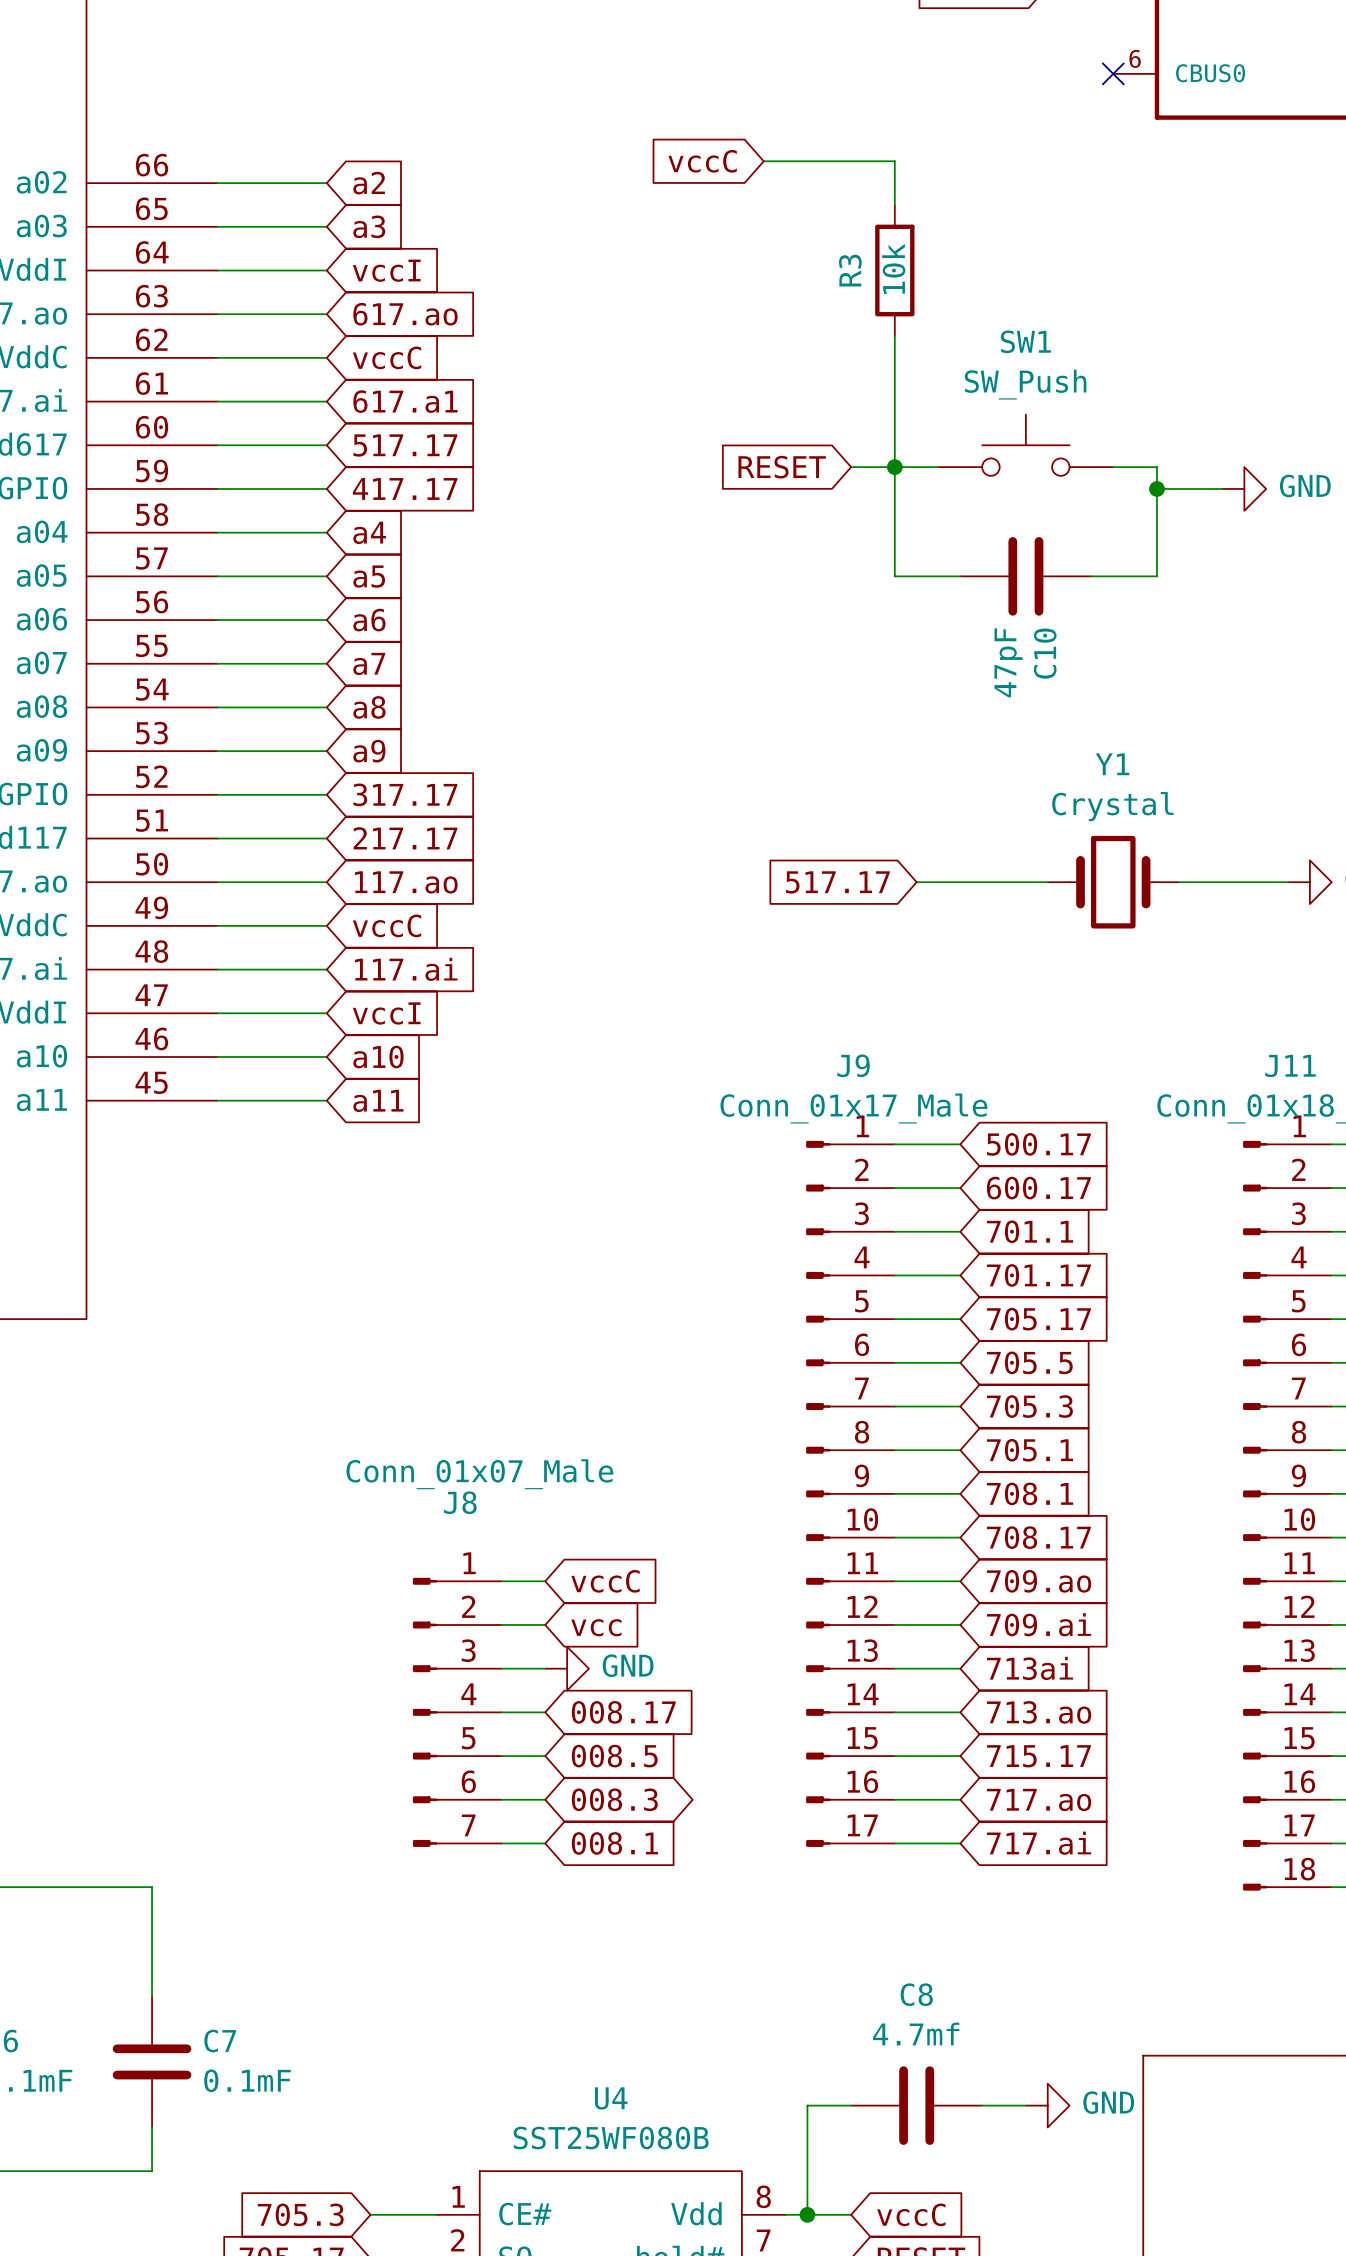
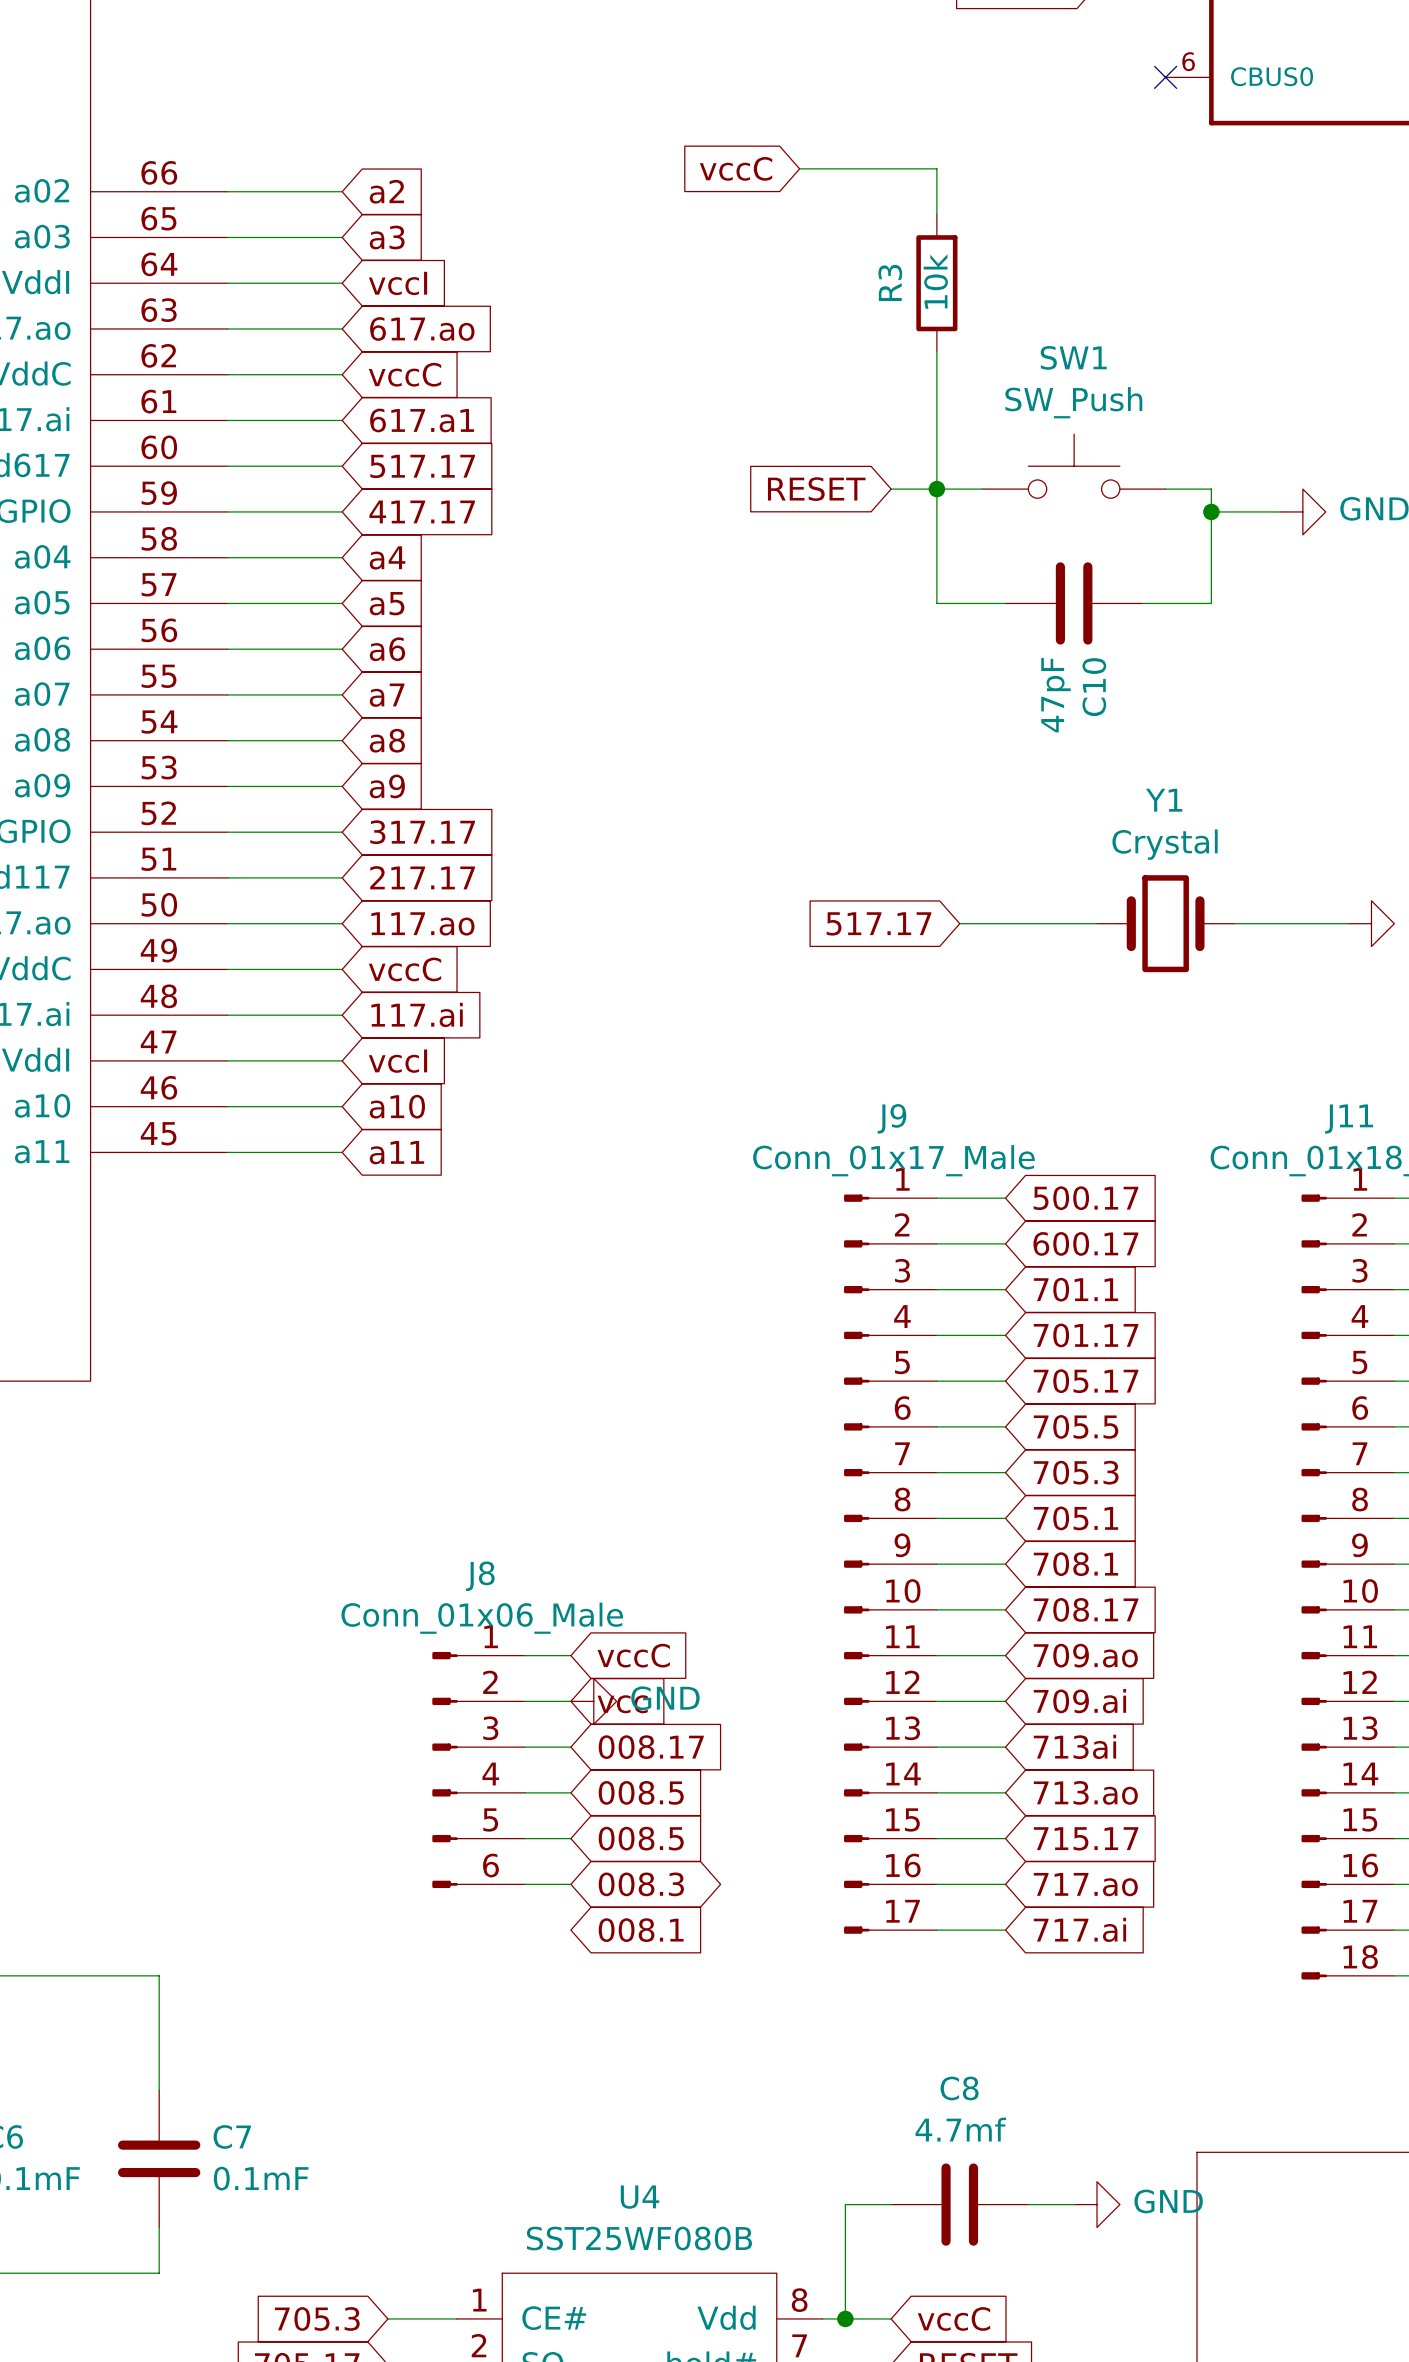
J8 value: Conn_01x07_Male (479, 1474) -> Conn_01x06_Male (482, 1618)
J8 symbol: [412, 1577, 502, 1847] -> [432, 1651, 526, 1889]
power symbol position: GND (567, 1668) -> GND (593, 1701)
global label: none -> 008.17 (651, 1747)
global label: 008.17 (623, 1712) -> 008.5 (641, 1792)
wire: (501, 1843) (545, 1843) -> none

